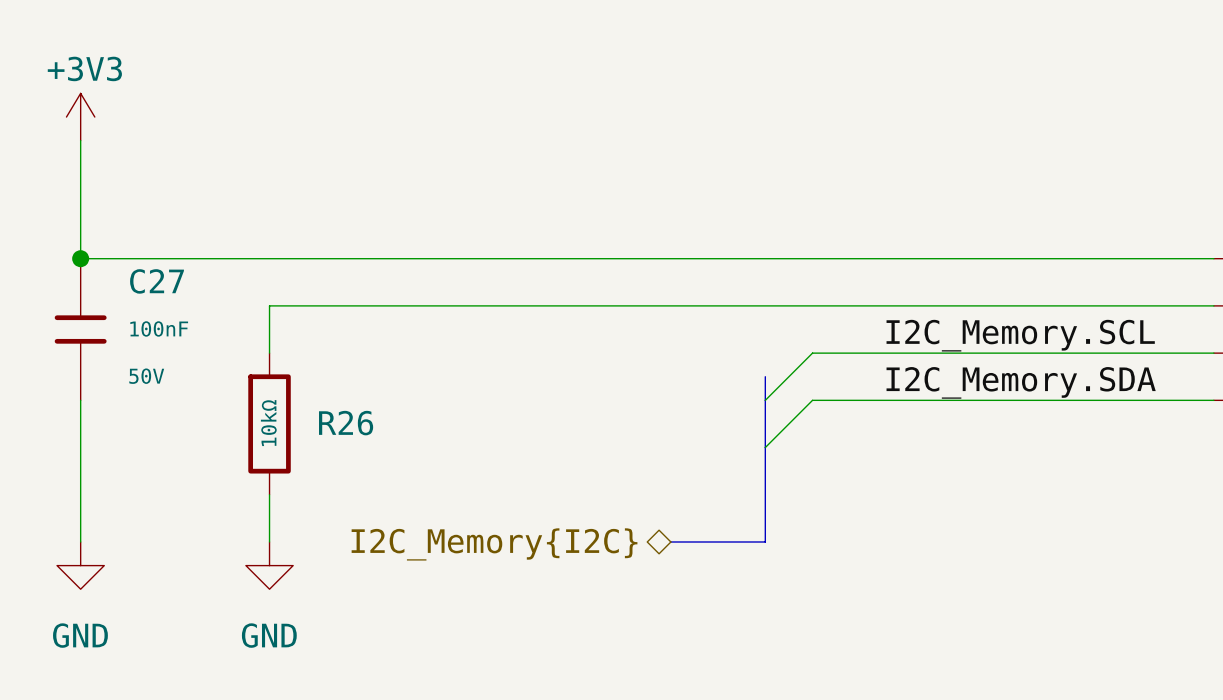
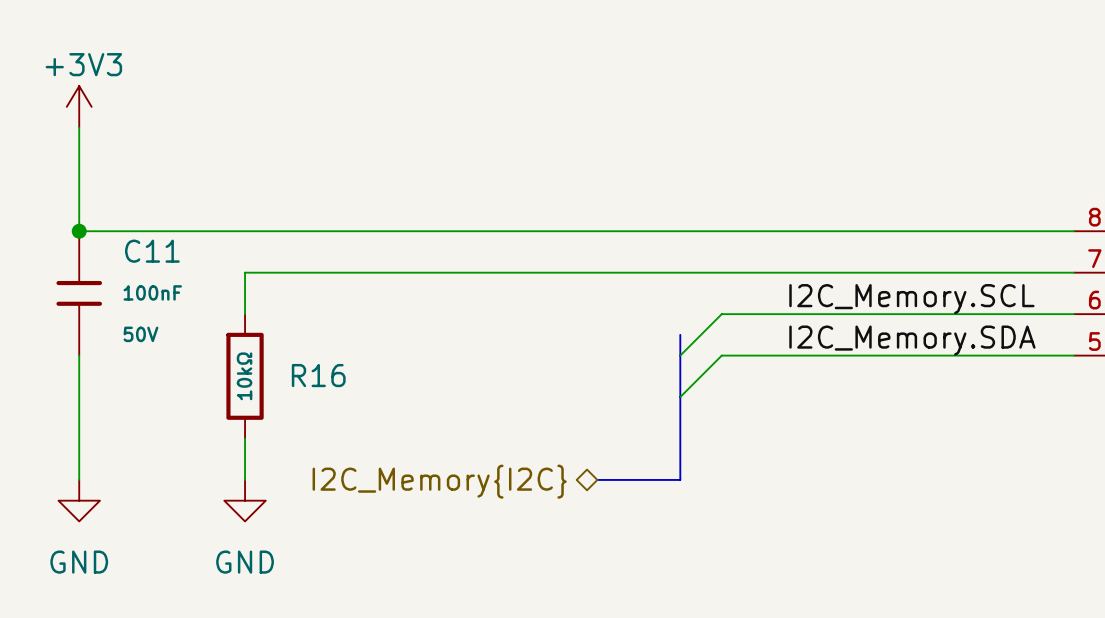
C27 name: C27 (157, 281) -> C11 (152, 251)
R26 name: R26 (346, 423) -> R16 (318, 375)

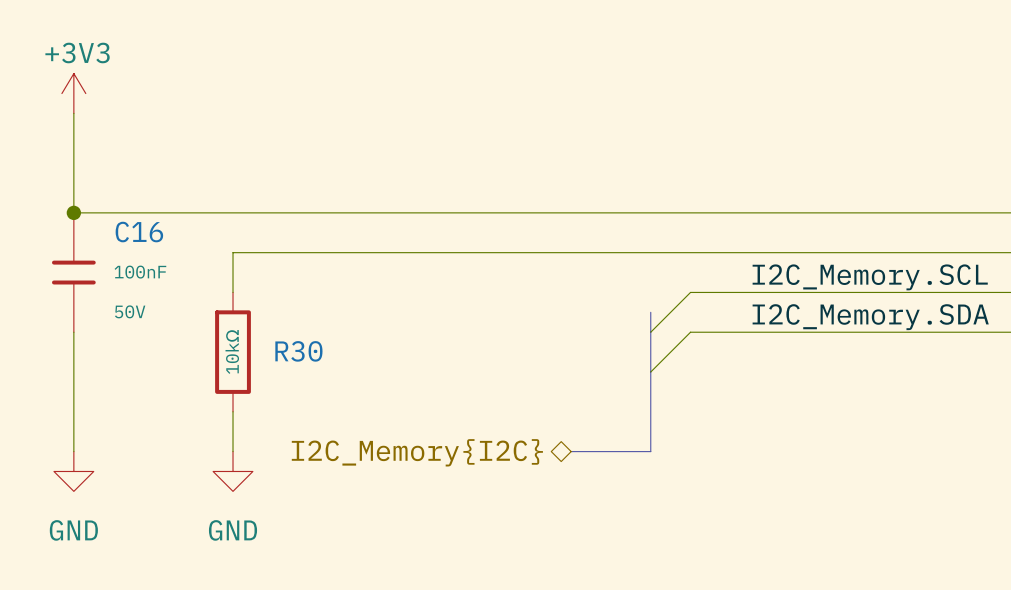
C11 name: C11 (152, 251) -> C16 (139, 232)
R16 name: R16 (318, 375) -> R30 (298, 351)

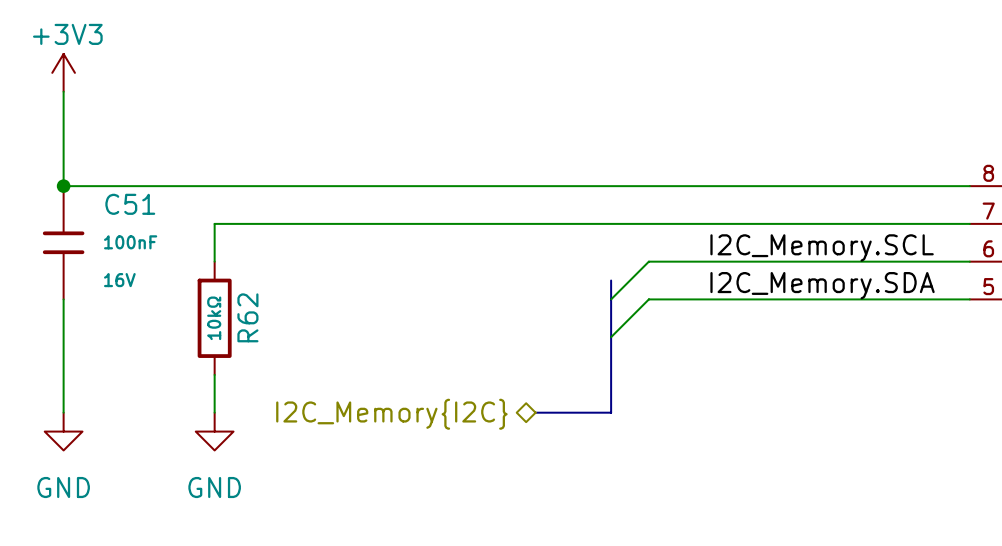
C16 name: C16 (139, 232) -> C51 (130, 204)
C16 text: 50V (130, 311) -> 16V (119, 280)
R30 name: R30 (298, 351) -> R62 (247, 317)

